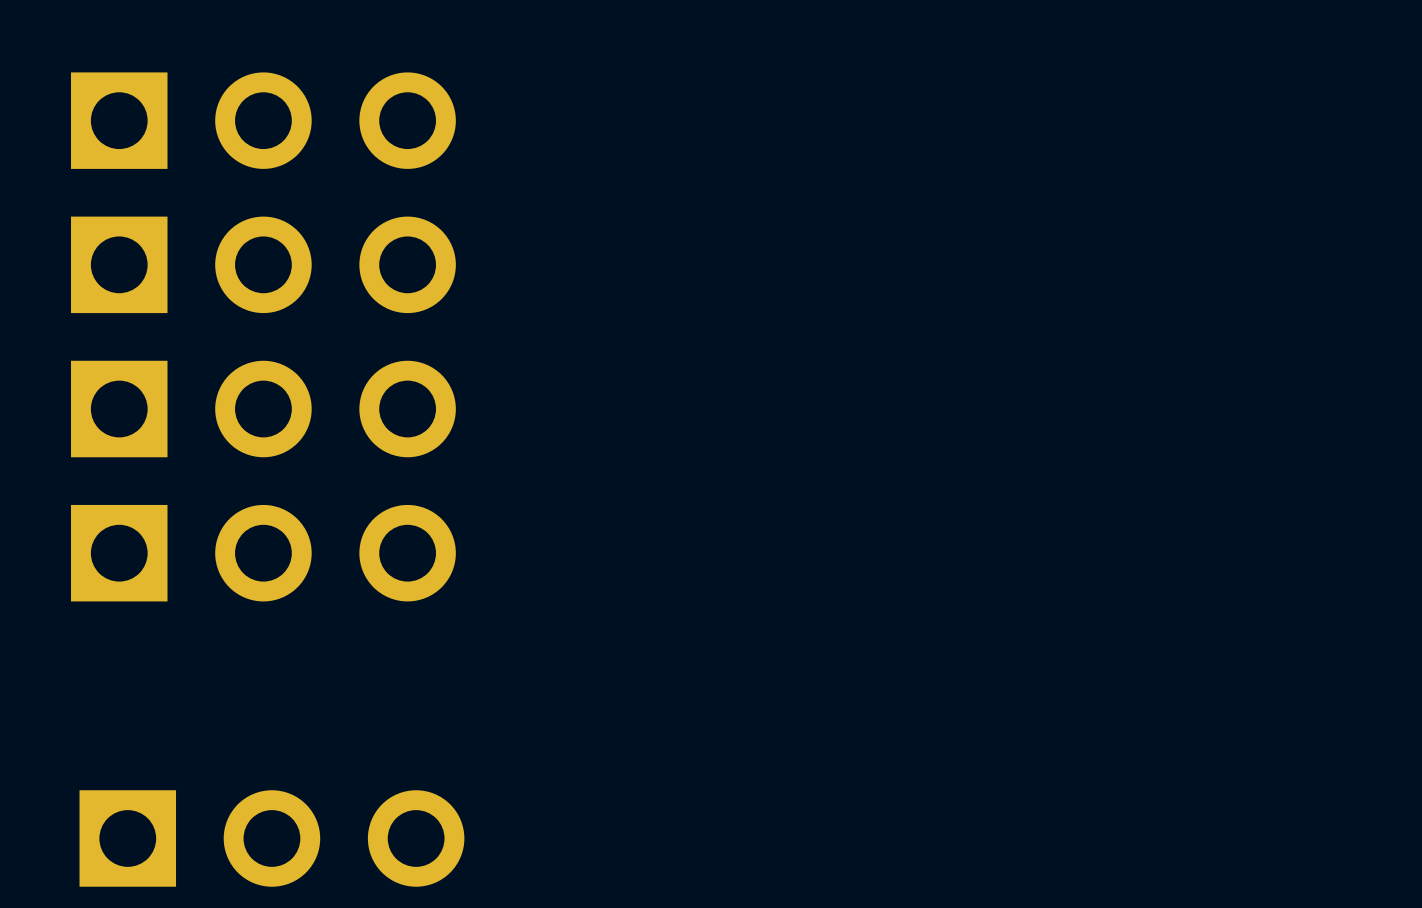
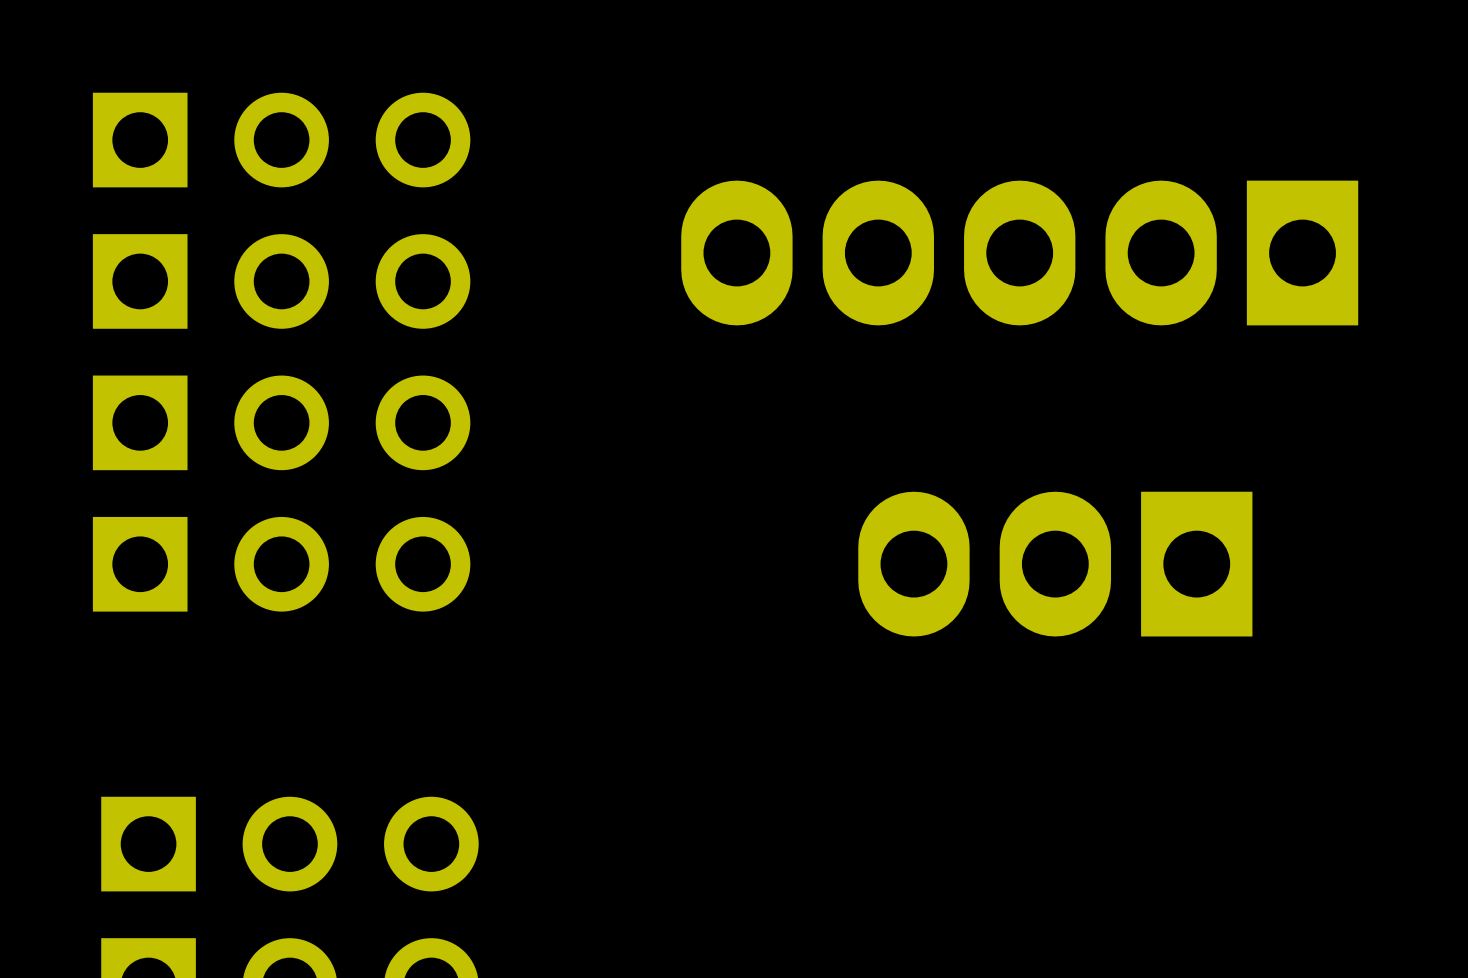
part: none -> (1019, 253)
part: none -> (1055, 564)

